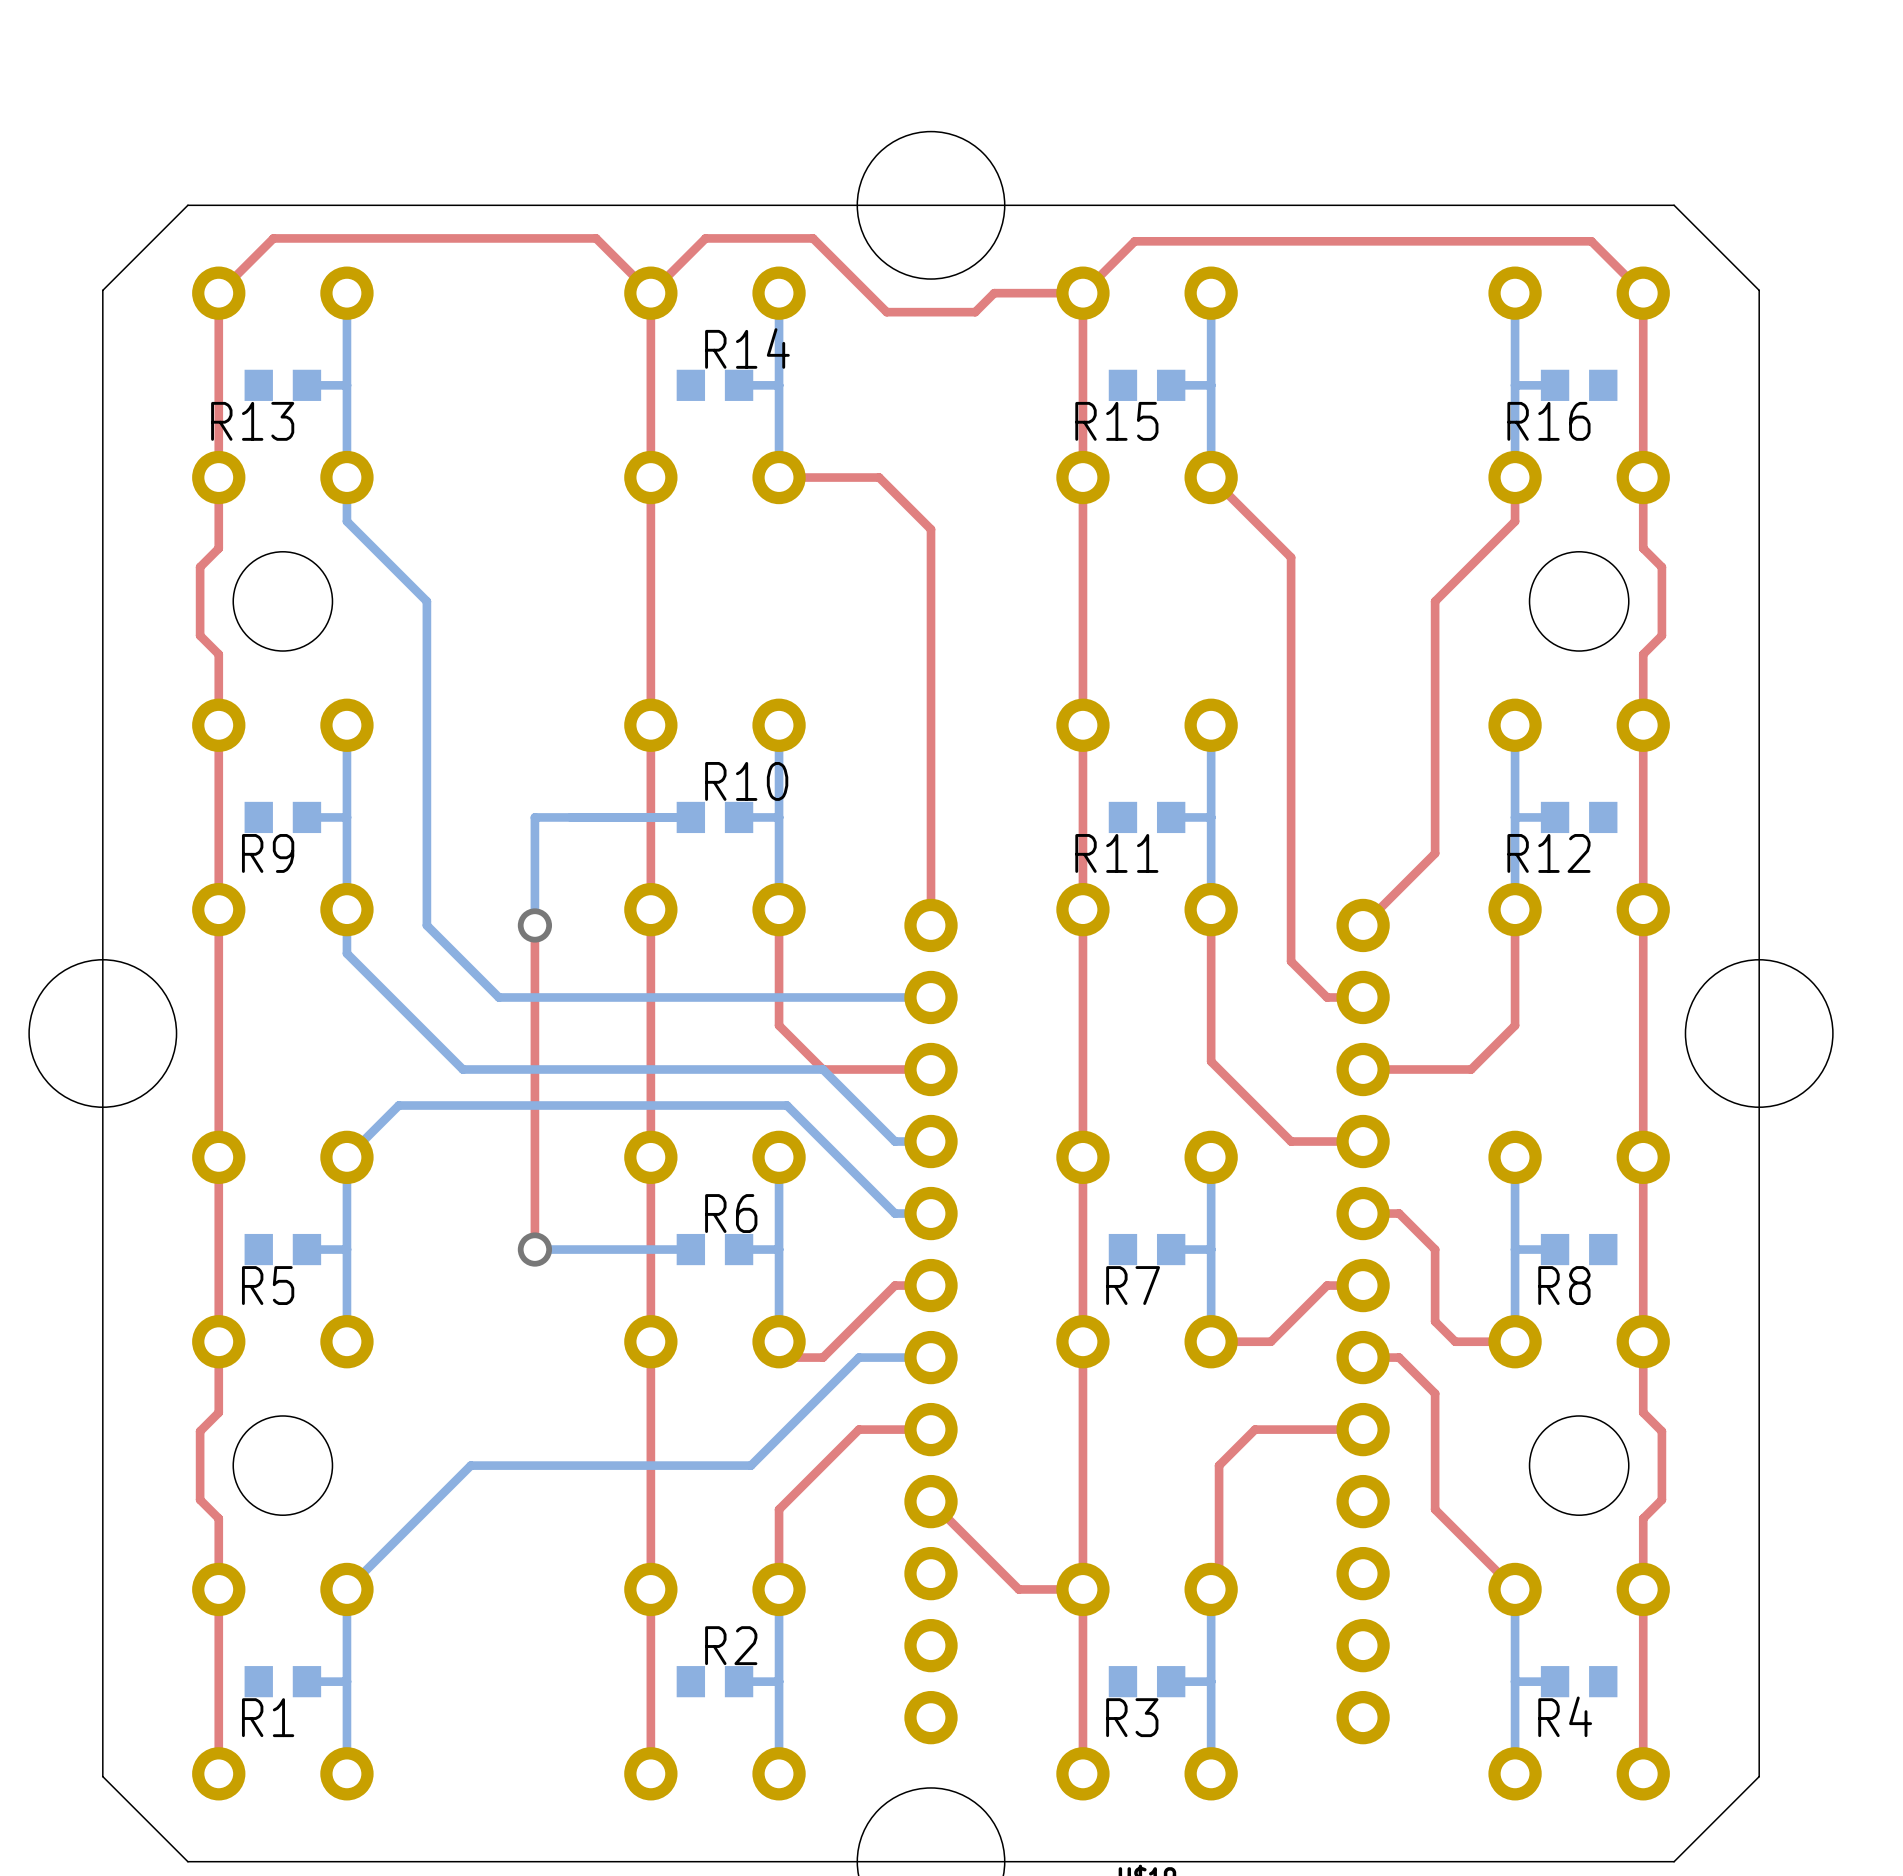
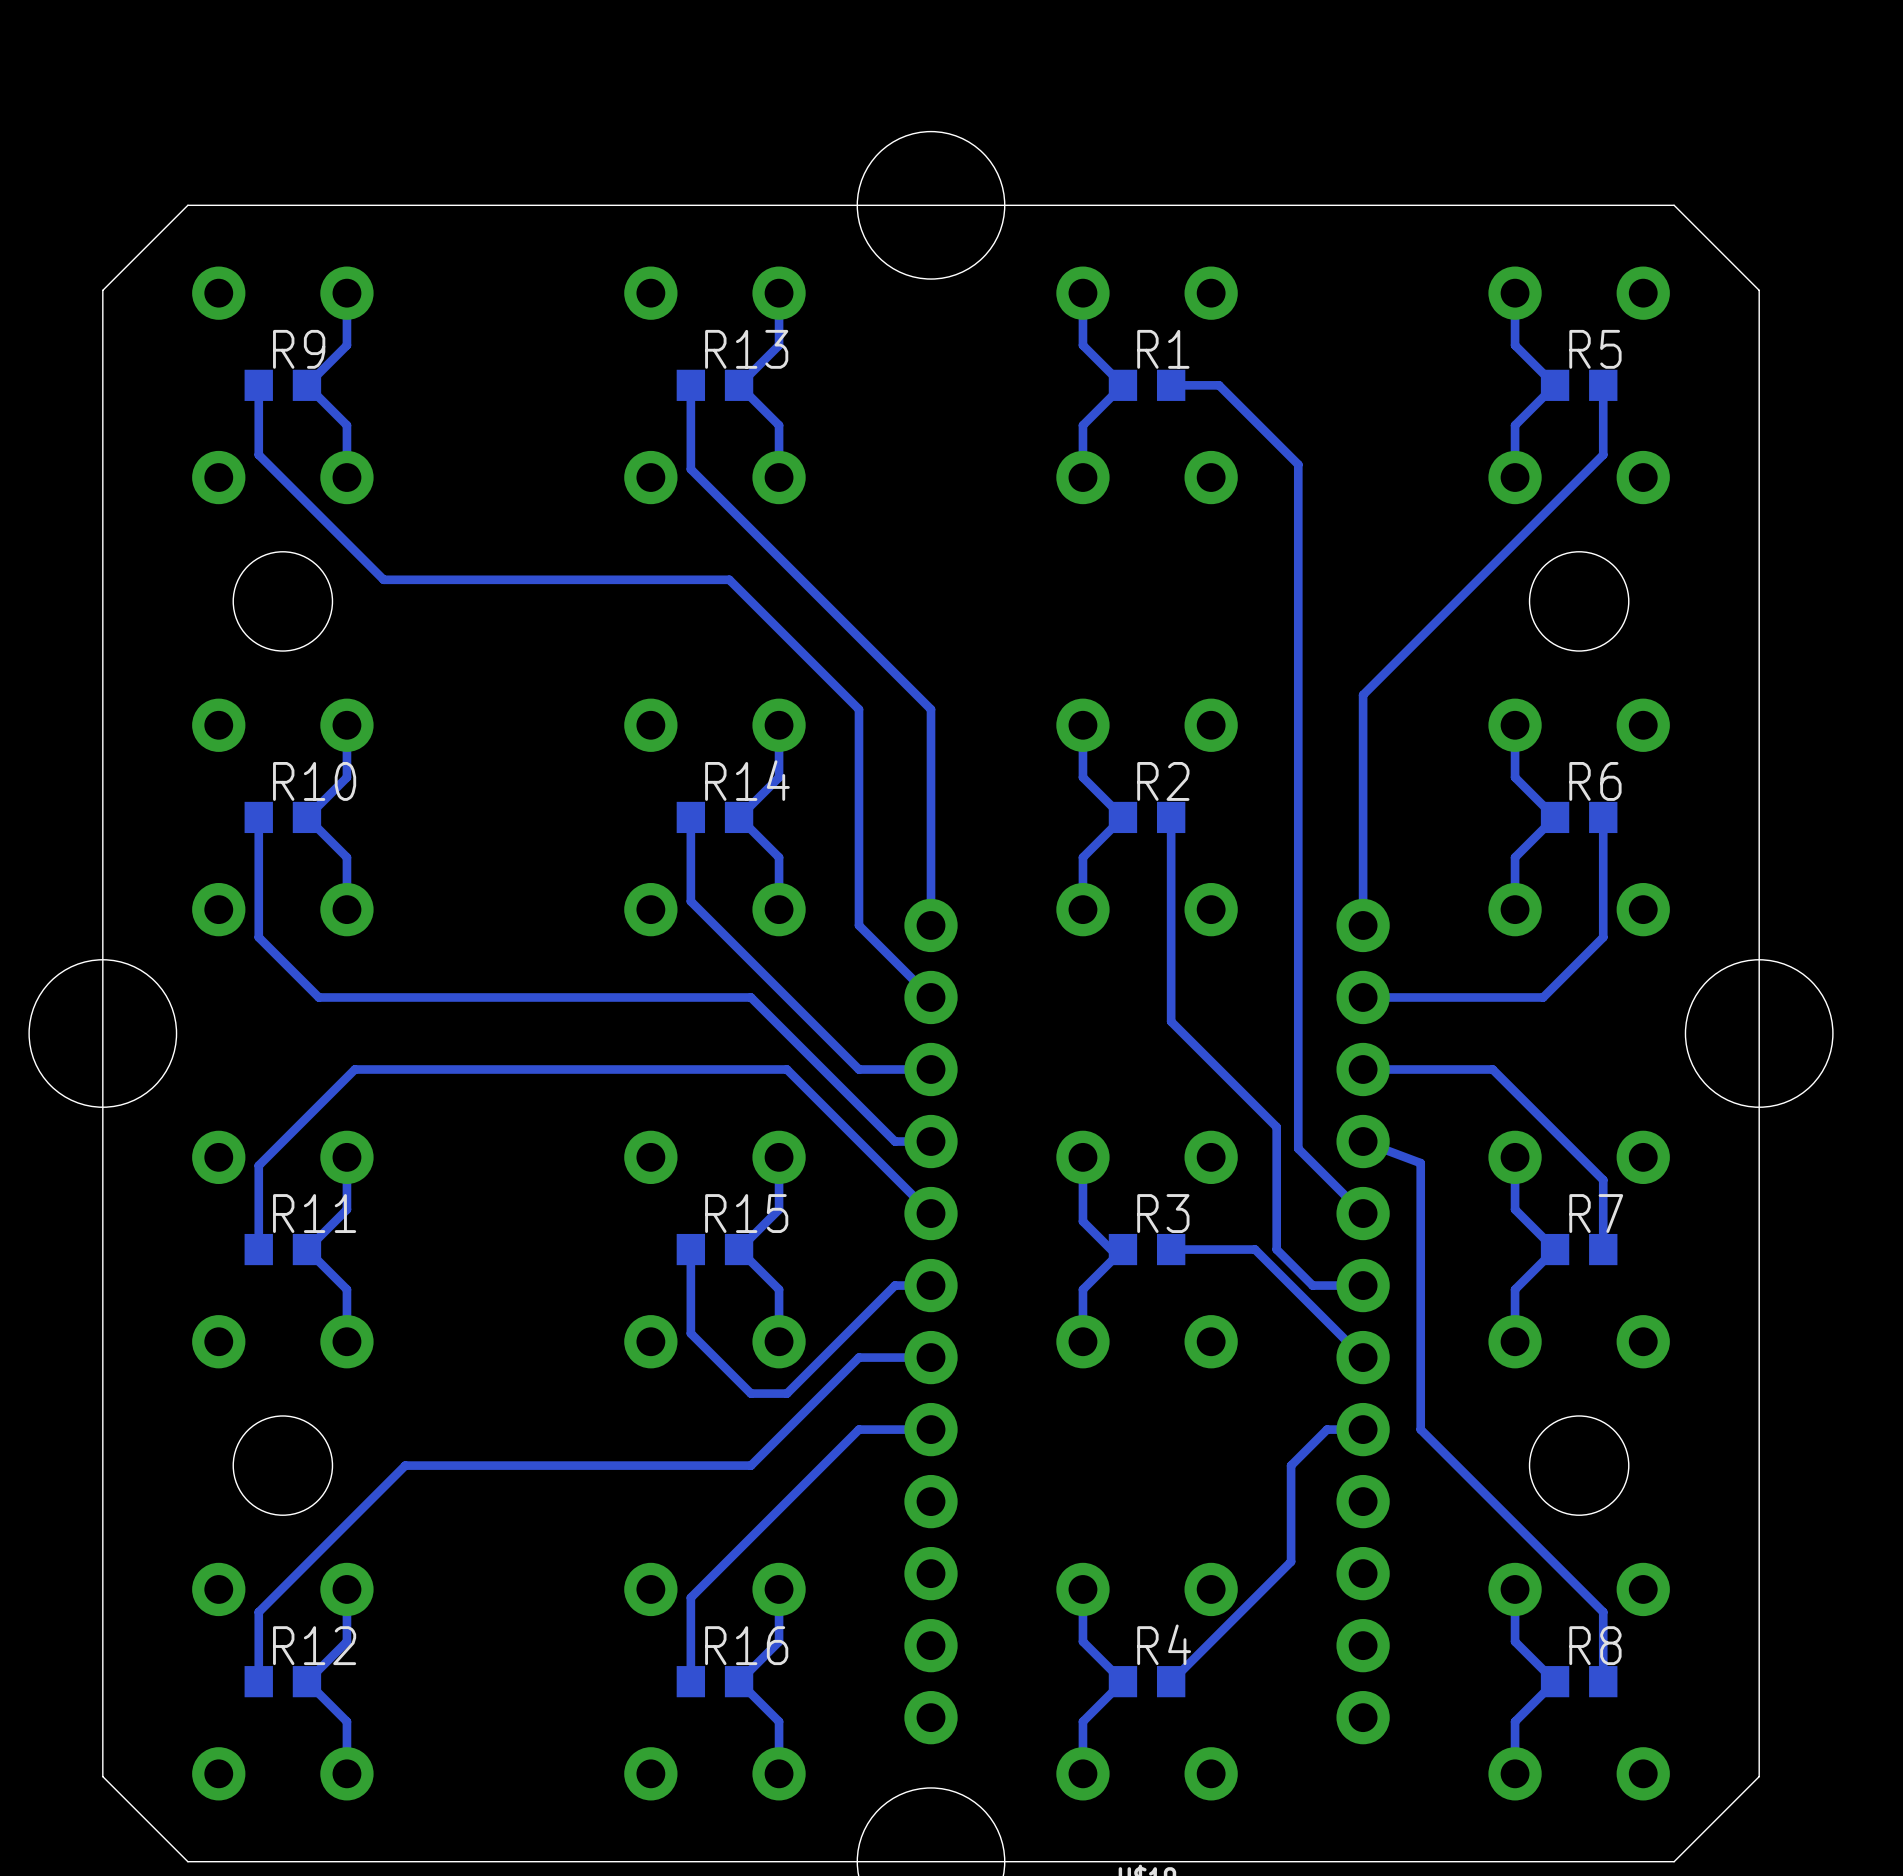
top track: (650, 293) (650, 1773) -> none
top track: (650, 293) (596, 238) (273, 238) (218, 293) (218, 548) (200, 567) (200, 635) (218, 654) (218, 1412) (200, 1431) (200, 1499) (218, 1518) (218, 1773) -> none
bottom track: none -> (1082, 293) (1082, 345) (1122, 385) (1082, 425) (1082, 477)
top track: (1082, 293) (1082, 1773) -> none
top track: (1082, 293) (1134, 241) (1591, 241) (1643, 293) (1643, 548) (1661, 567) (1661, 635) (1643, 654) (1643, 1412) (1661, 1431) (1661, 1499) (1643, 1518) (1643, 1773) -> none
top track: (1082, 293) (994, 293) (975, 312) (886, 312) (813, 238) (705, 238) (650, 293) -> none
bottom track: (1211, 293) (1211, 477) -> none
bottom track: (346, 345) (346, 425) -> (346, 345) (306, 385) (346, 425)
bottom track: (779, 345) (779, 425) -> (779, 345) (739, 385) (779, 425)
bottom track: (1515, 345) (1515, 425) -> (1515, 345) (1555, 385) (1515, 425)
R14 name: R14 (747, 348) -> R13 (746, 349)
bottom track: (346, 385) (306, 385) -> none
bottom track: none -> (690, 385) (690, 469) (931, 709) (931, 925)
bottom track: (779, 385) (739, 385) -> none
bottom track: none -> (1211, 385) (1219, 385) (1298, 464) (1298, 1148) (1363, 1213)
bottom track: (1555, 385) (1515, 385) -> none
bottom track: none -> (1603, 385) (1603, 454) (1363, 695) (1363, 925)
R13 name: R13 (252, 421) -> R9 (299, 349)
R15 name: R15 (1116, 421) -> R1 (1163, 349)
R16 name: R16 (1548, 421) -> R5 (1595, 349)
bottom track: (346, 477) (346, 521) (426, 601) (426, 925) (498, 997) -> (258, 817) (258, 937) (318, 997) (498, 997)
top track: (779, 477) (879, 477) (931, 529) (931, 925) -> none
top track: (1211, 477) (1291, 557) (1291, 961) (1327, 997) (1363, 997) -> none
top track: (1515, 477) (1515, 521) (1435, 601) (1435, 853) (1363, 925) -> none
bottom track: none -> (1082, 725) (1082, 777) (1122, 817) (1082, 857) (1082, 909)
bottom track: (1211, 725) (1211, 909) -> none
bottom track: (346, 777) (346, 857) -> (346, 777) (306, 817) (346, 857)
bottom track: (779, 777) (779, 857) -> (779, 777) (739, 817) (779, 857)
bottom track: (1515, 777) (1515, 857) -> (1515, 777) (1555, 817) (1515, 857)
R10 name: R10 (746, 781) -> R14 (747, 780)
bottom track: (346, 817) (306, 817) -> none
bottom track: (690, 817) (534, 817) (534, 925) -> (690, 817) (690, 901) (858, 1069) (931, 1069)
bottom track: (779, 817) (739, 817) -> none
bottom track: (1211, 817) (1171, 817) -> (1363, 1285) (1312, 1285) (1276, 1249) (1276, 1127) (1171, 1021) (1171, 817)
bottom track: (1555, 817) (1515, 817) -> none
bottom track: none -> (1603, 817) (1603, 937) (1543, 997) (1363, 997)
R9 name: R9 (268, 853) -> R10 (314, 781)
R11 name: R11 (1116, 853) -> R2 (1163, 781)
R12 name: R12 (1548, 853) -> R6 (1595, 781)
bottom track: (346, 909) (346, 953) (462, 1069) -> (258, 1249) (258, 1165) (354, 1069) (462, 1069)
top track: (779, 909) (779, 1025) (822, 1069) (931, 1069) -> none
top track: (1211, 909) (1211, 1061) (1291, 1141) (1363, 1141) -> none
top track: (1515, 909) (1515, 1025) (1471, 1069) (1363, 1069) -> none
top track: (534, 925) (534, 1249) -> none
via: (534, 925) -> none
bottom track: (931, 997) (750, 997) -> (931, 997) (858, 925) (858, 709) (729, 579) (383, 579) (258, 454) (258, 385)
bottom track: (822, 1069) (786, 1069) -> (822, 1069) (750, 997)
bottom track: none -> (1363, 1069) (1492, 1069) (1603, 1180) (1603, 1249)
bottom track: none -> (1363, 1141) (1420, 1163) (1420, 1429) (1603, 1612) (1603, 1681)
bottom track: (346, 1157) (398, 1105) (786, 1105) (895, 1213) (931, 1213) -> (786, 1069) (931, 1213)
bottom track: none -> (1082, 1157) (1082, 1221) (1117, 1255)
bottom track: (1211, 1157) (1211, 1341) -> none
bottom track: (346, 1209) (346, 1289) -> (346, 1209) (306, 1249) (346, 1289)
bottom track: (779, 1209) (779, 1289) -> (779, 1209) (739, 1249) (779, 1289)
bottom track: (1515, 1209) (1515, 1289) -> (1515, 1209) (1555, 1249) (1515, 1289)
R6 name: R6 (731, 1213) -> R15 (746, 1213)
top track: (1363, 1213) (1399, 1213) (1435, 1249) (1435, 1321) (1455, 1341) (1515, 1341) -> none
bottom track: (346, 1249) (306, 1249) -> none
via: (534, 1249) -> none
bottom track: (690, 1249) (534, 1249) -> (690, 1249) (690, 1333) (750, 1393) (786, 1393) (895, 1285) (931, 1285)
bottom track: (779, 1249) (739, 1249) -> none
bottom track: none -> (1122, 1249) (1082, 1289) (1082, 1341)
bottom track: none -> (1211, 1249) (1255, 1249) (1363, 1357)
bottom track: (1555, 1249) (1515, 1249) -> none
R5 name: R5 (268, 1285) -> R11 (314, 1213)
top track: (931, 1285) (895, 1285) (822, 1357) (786, 1357) (786, 1349) (779, 1341) -> none
R7 name: R7 (1133, 1285) -> R3 (1163, 1213)
top track: (1363, 1285) (1327, 1285) (1270, 1341) (1211, 1341) -> none
R8 name: R8 (1564, 1285) -> R7 (1596, 1213)
top track: (1363, 1357) (1399, 1357) (1435, 1393) (1435, 1509) (1515, 1589) -> none
bottom track: none -> (931, 1429) (858, 1429) (690, 1597) (690, 1681)
top track: (931, 1429) (858, 1429) (779, 1509) (779, 1589) -> none
top track: (1363, 1429) (1255, 1429) (1219, 1465) (1219, 1581) (1211, 1589) -> none
bottom track: (470, 1465) (346, 1589) -> (470, 1465) (405, 1465) (258, 1612) (258, 1681)
top track: (931, 1501) (1018, 1589) (1082, 1589) -> none
bottom track: none -> (1082, 1589) (1082, 1641) (1122, 1681) (1082, 1721) (1082, 1773)
bottom track: (1211, 1589) (1211, 1773) -> none
bottom track: (346, 1641) (346, 1721) -> (346, 1641) (306, 1681) (346, 1721)
bottom track: (779, 1641) (779, 1721) -> (779, 1641) (739, 1681) (779, 1721)
bottom track: (1515, 1641) (1515, 1721) -> (1515, 1641) (1555, 1681) (1515, 1721)
R2 name: R2 (731, 1645) -> R16 (746, 1645)
bottom track: (346, 1681) (306, 1681) -> none
bottom track: (779, 1681) (739, 1681) -> none
bottom track: (1211, 1681) (1171, 1681) -> (1363, 1429) (1327, 1429) (1291, 1465) (1291, 1561) (1171, 1681)
bottom track: (1555, 1681) (1515, 1681) -> none
R4 name: R4 (1565, 1716) -> R8 (1595, 1645)
R1 name: R1 (268, 1717) -> R12 (314, 1645)
R3 name: R3 (1132, 1717) -> R4 (1164, 1644)

